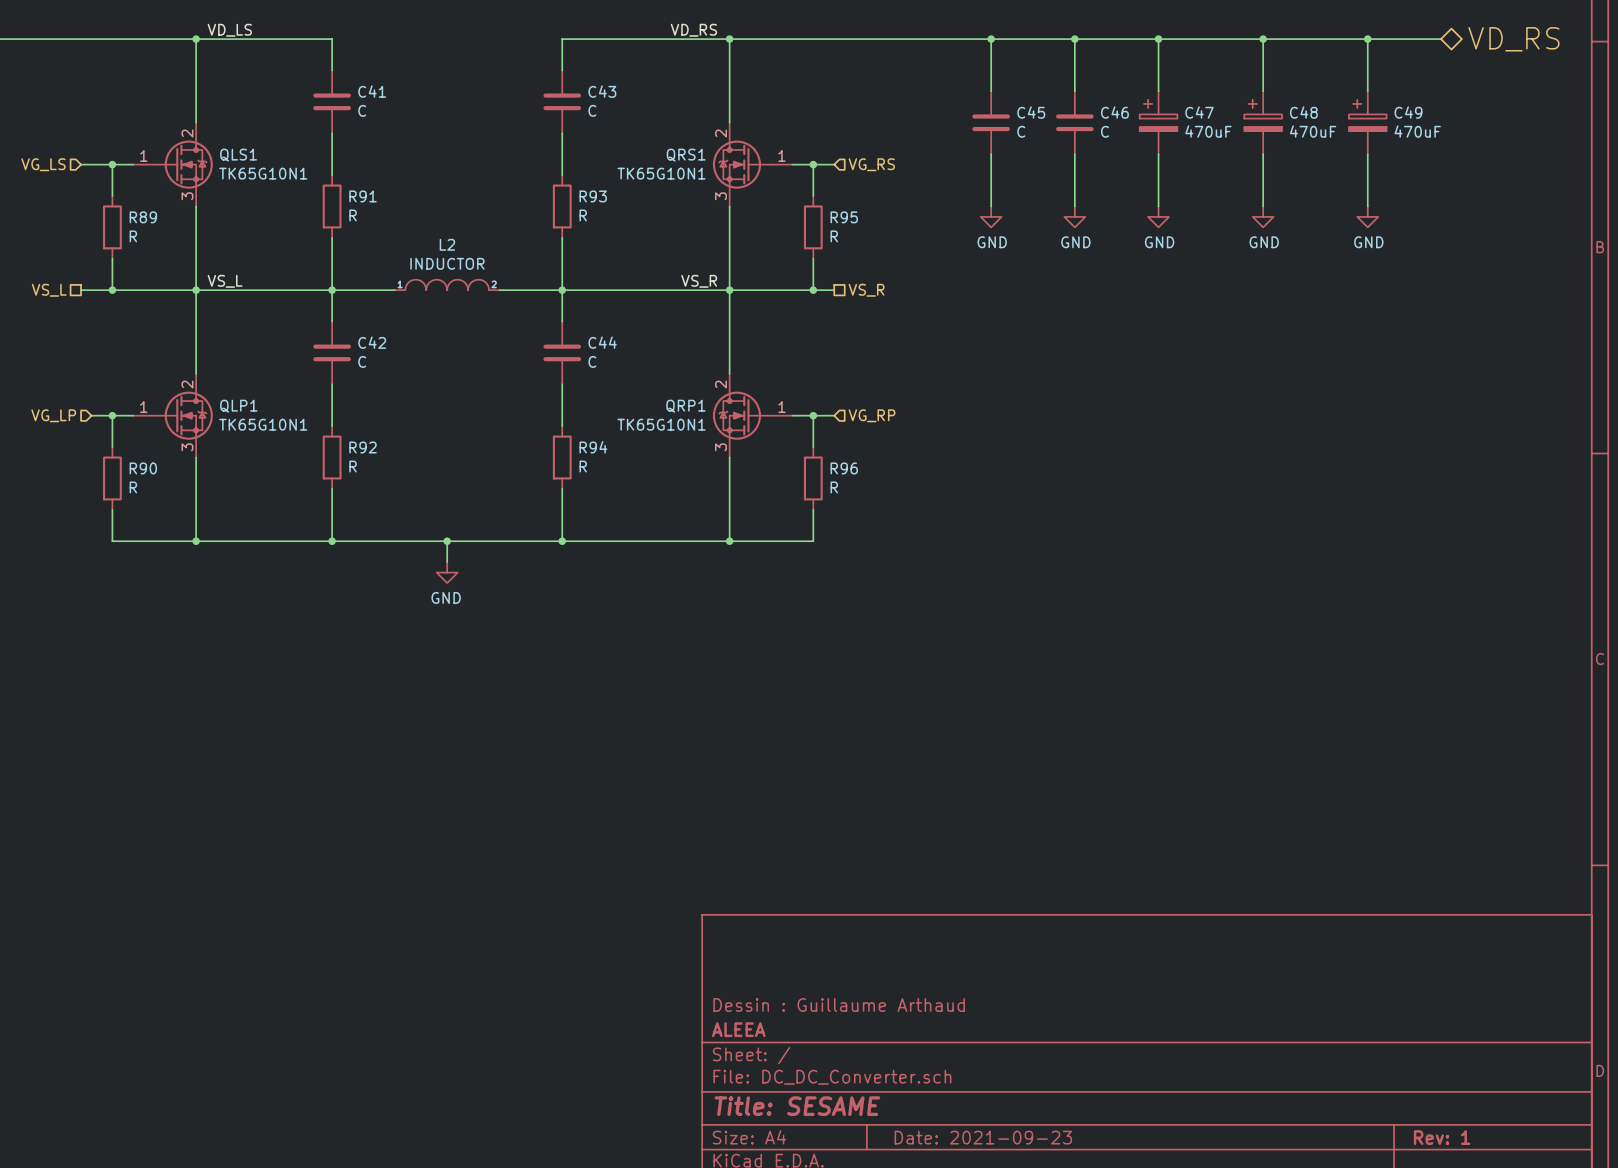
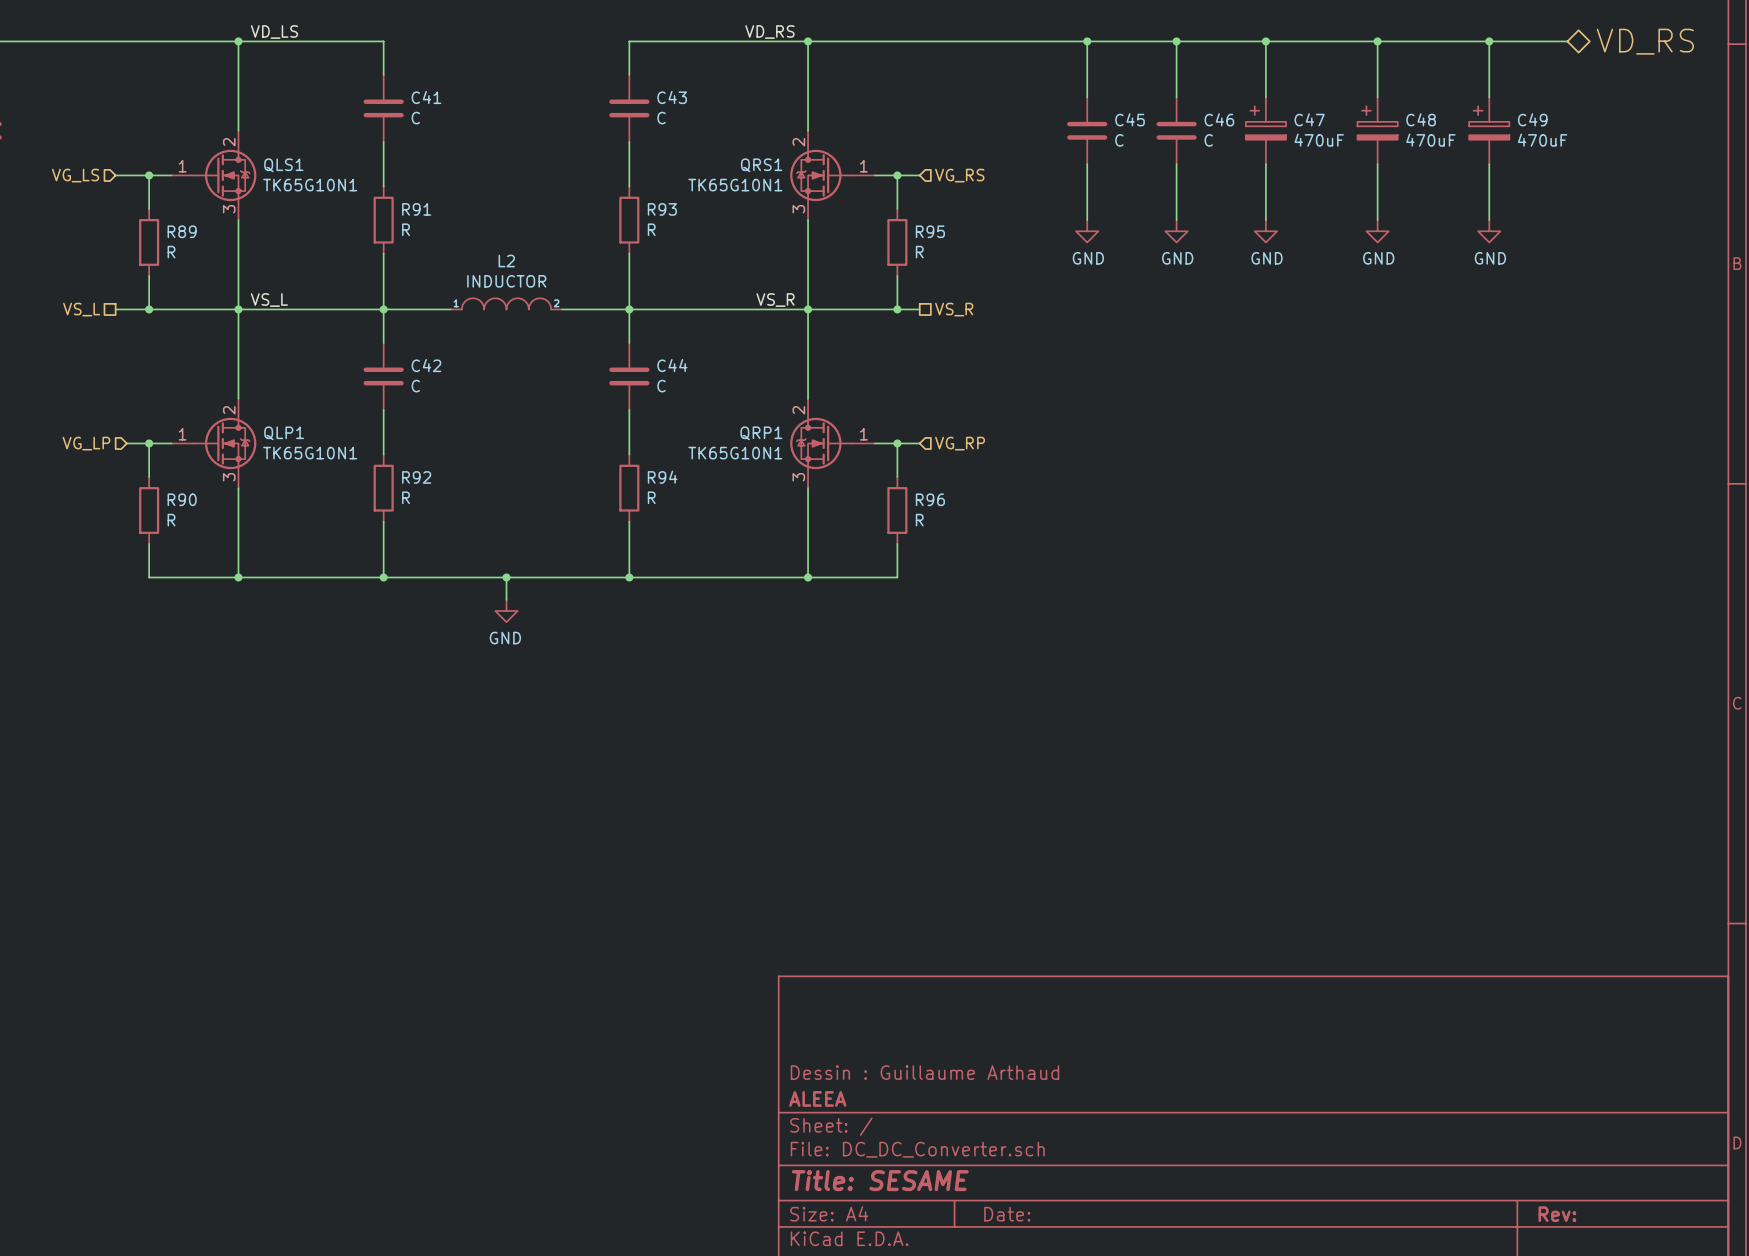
title block: Date: 2021-09-23 (983, 1137) -> Date: (1007, 1214)
title block: Rev: 1 (1442, 1137) -> Rev: (1557, 1214)

